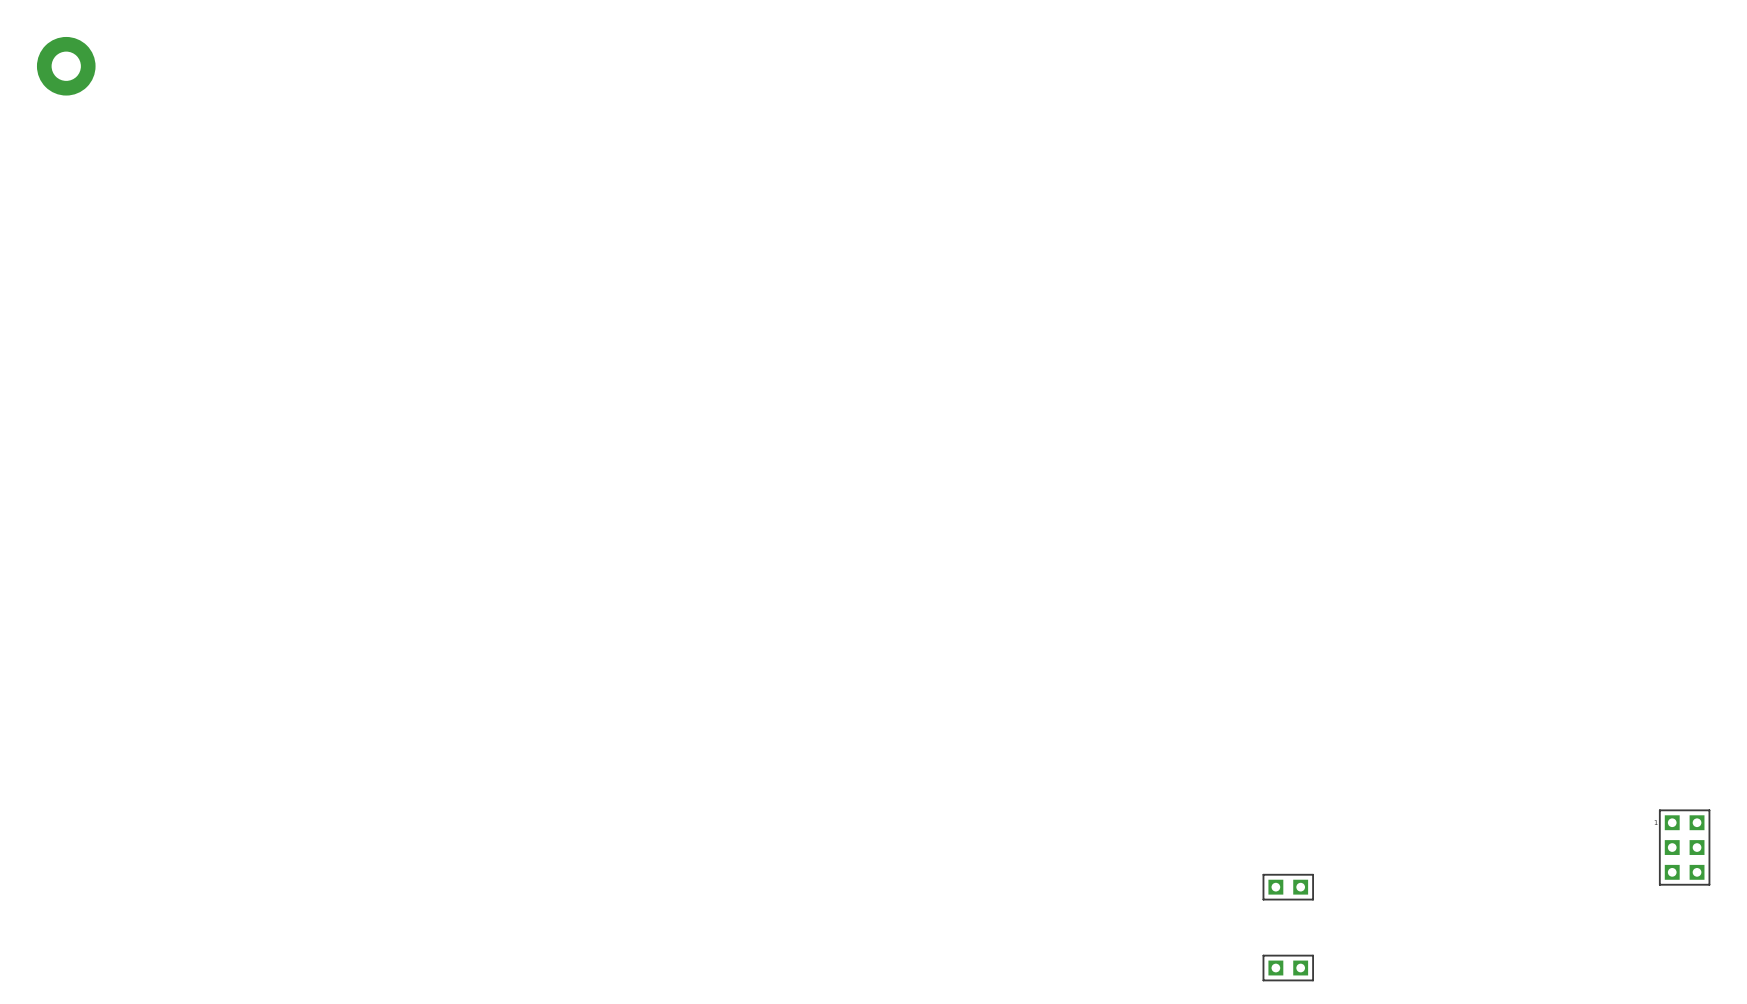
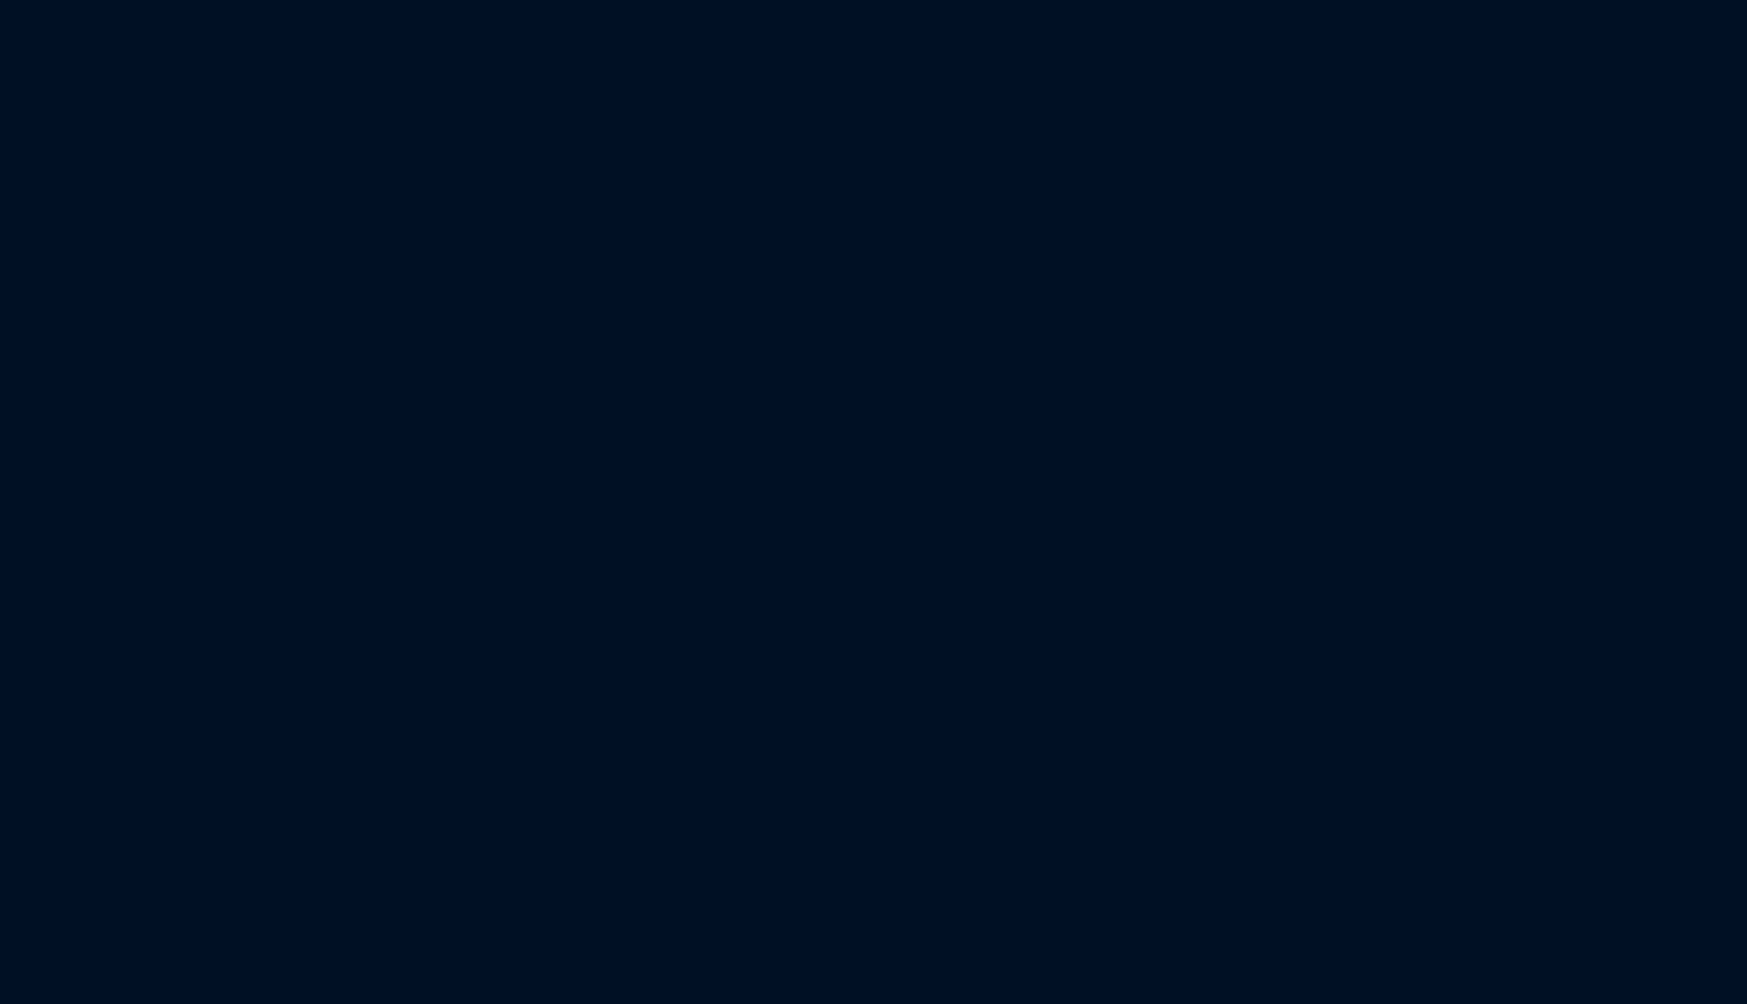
part: (66, 66) -> none
part: (1684, 847) -> none
part: (1288, 887) -> none
part: (1288, 968) -> none

